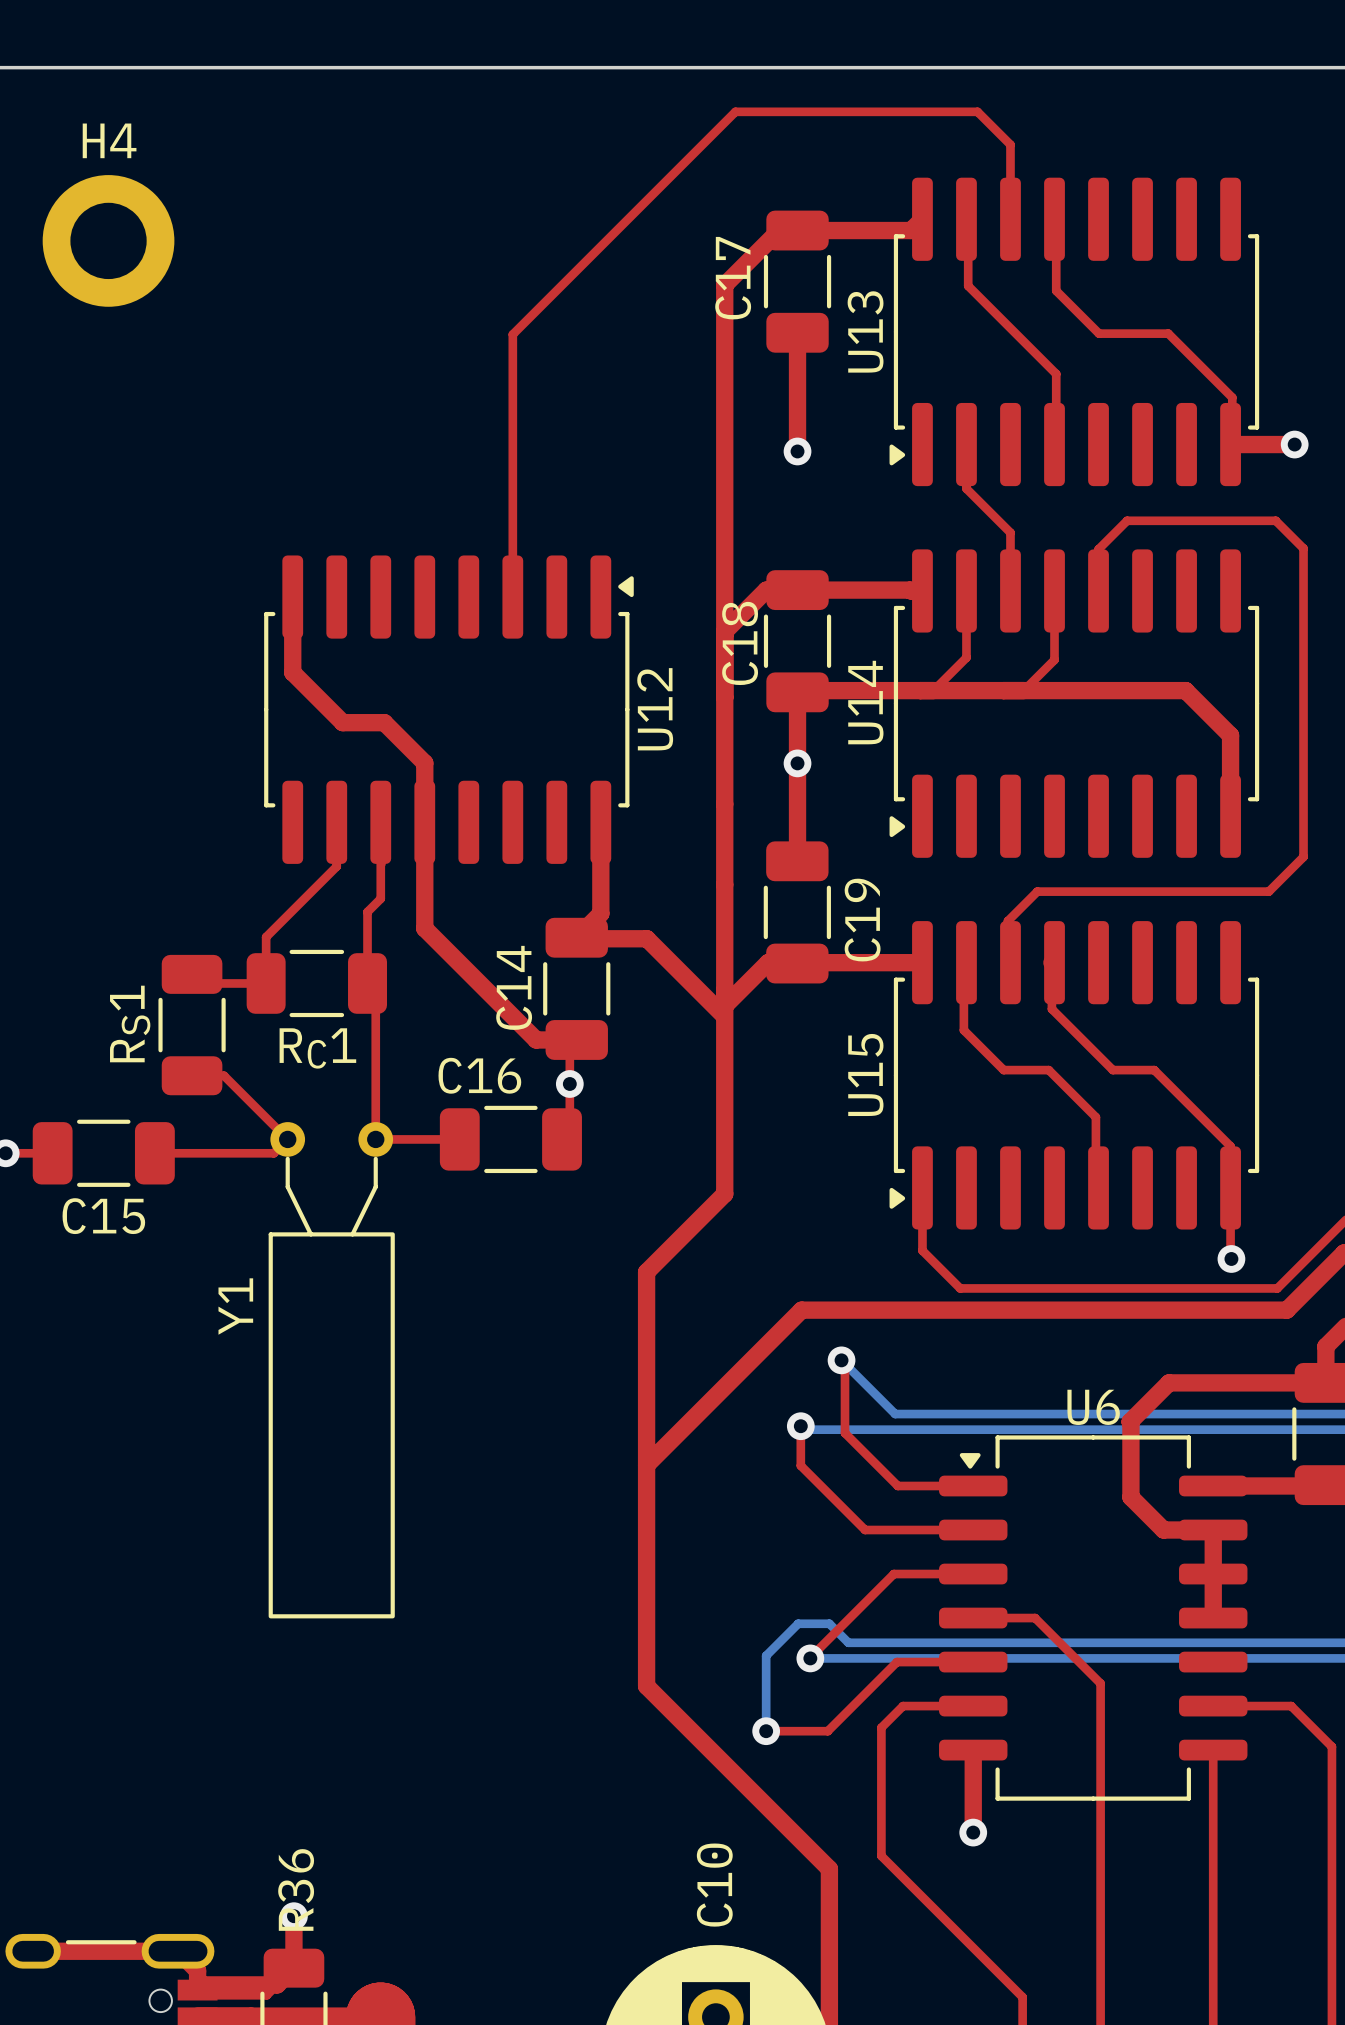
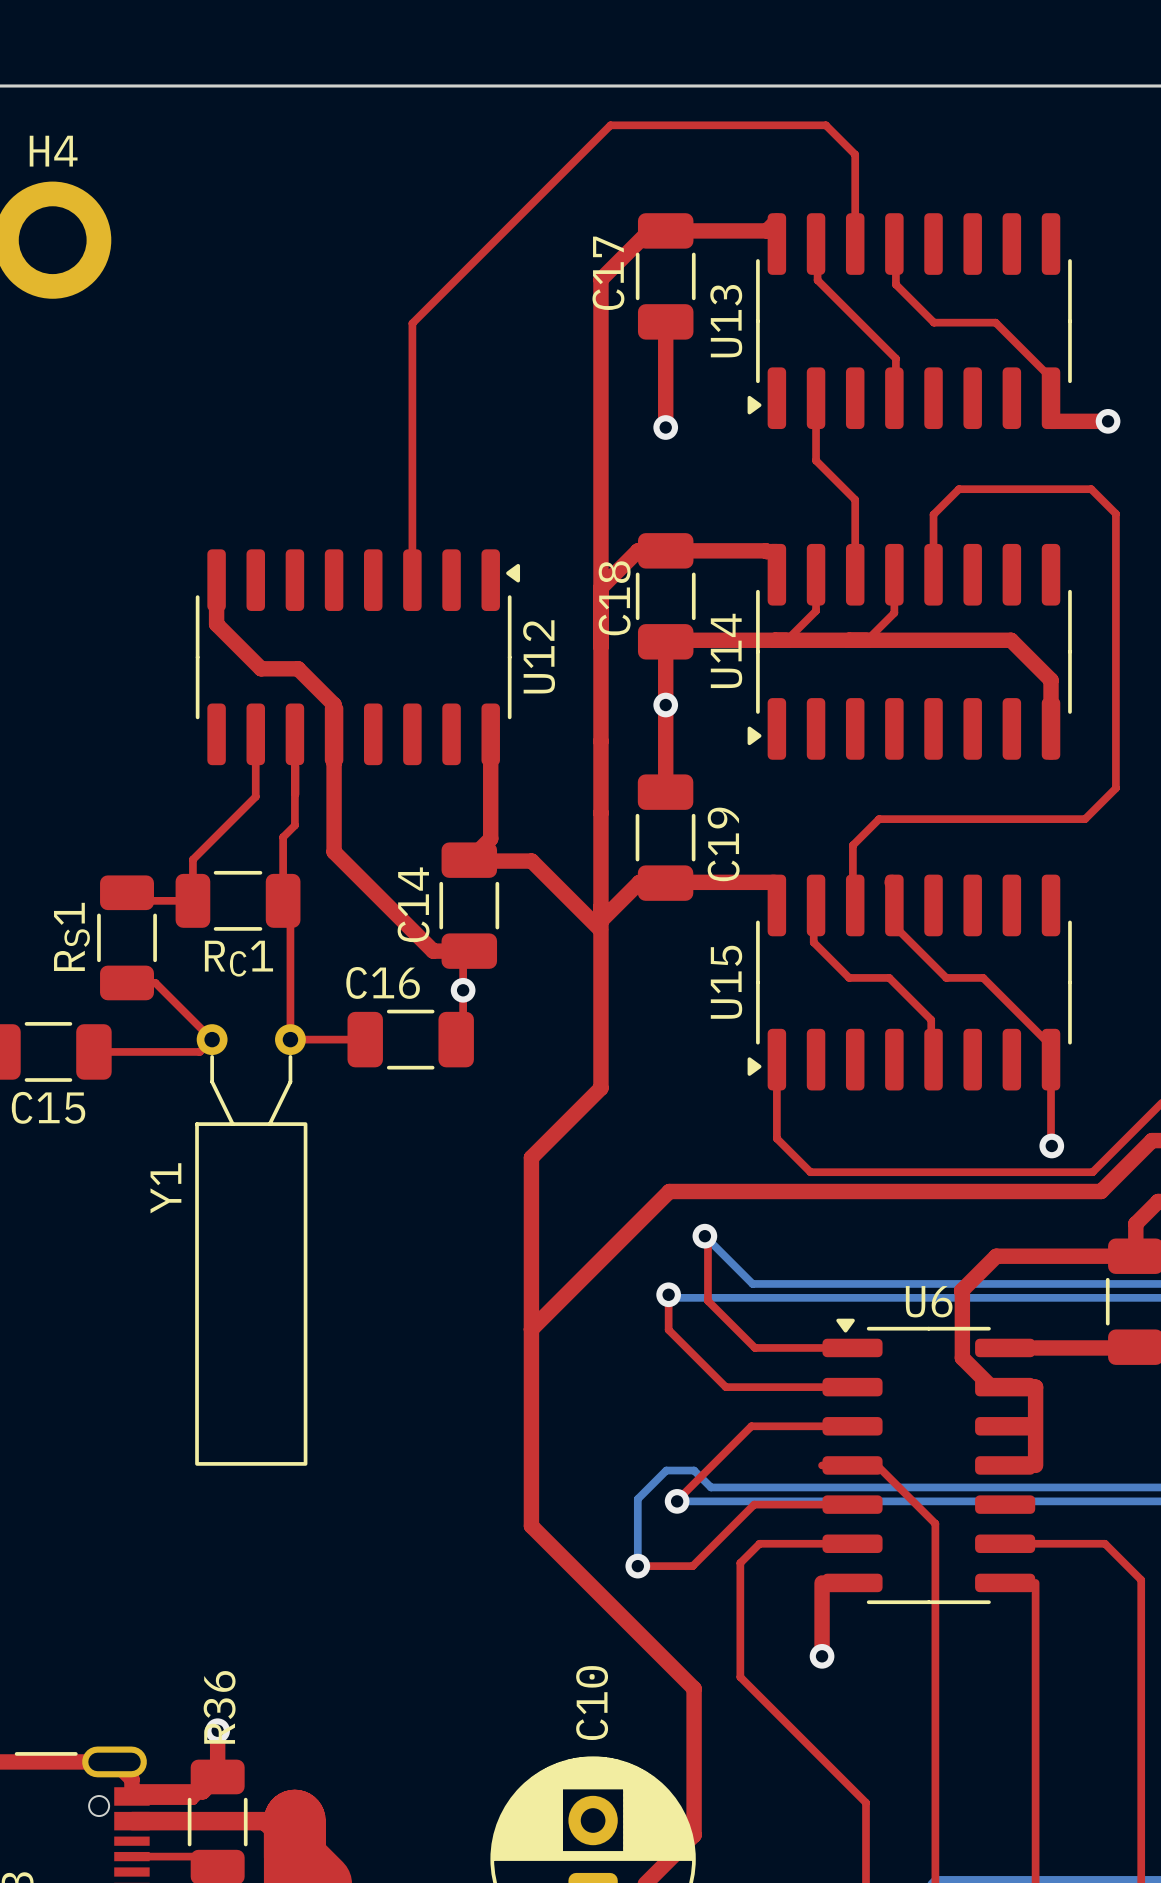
U13 footprint: [889, 177, 1260, 487] -> [747, 213, 1072, 430]
U14 footprint: [889, 549, 1260, 858] -> [747, 543, 1072, 760]
U12 footprint: [264, 555, 634, 864] -> [195, 549, 521, 766]
U15 footprint: [889, 921, 1260, 1230] -> [747, 874, 1072, 1091]
U6 footprint: [939, 1435, 1248, 1801] -> [822, 1318, 1036, 1605]

